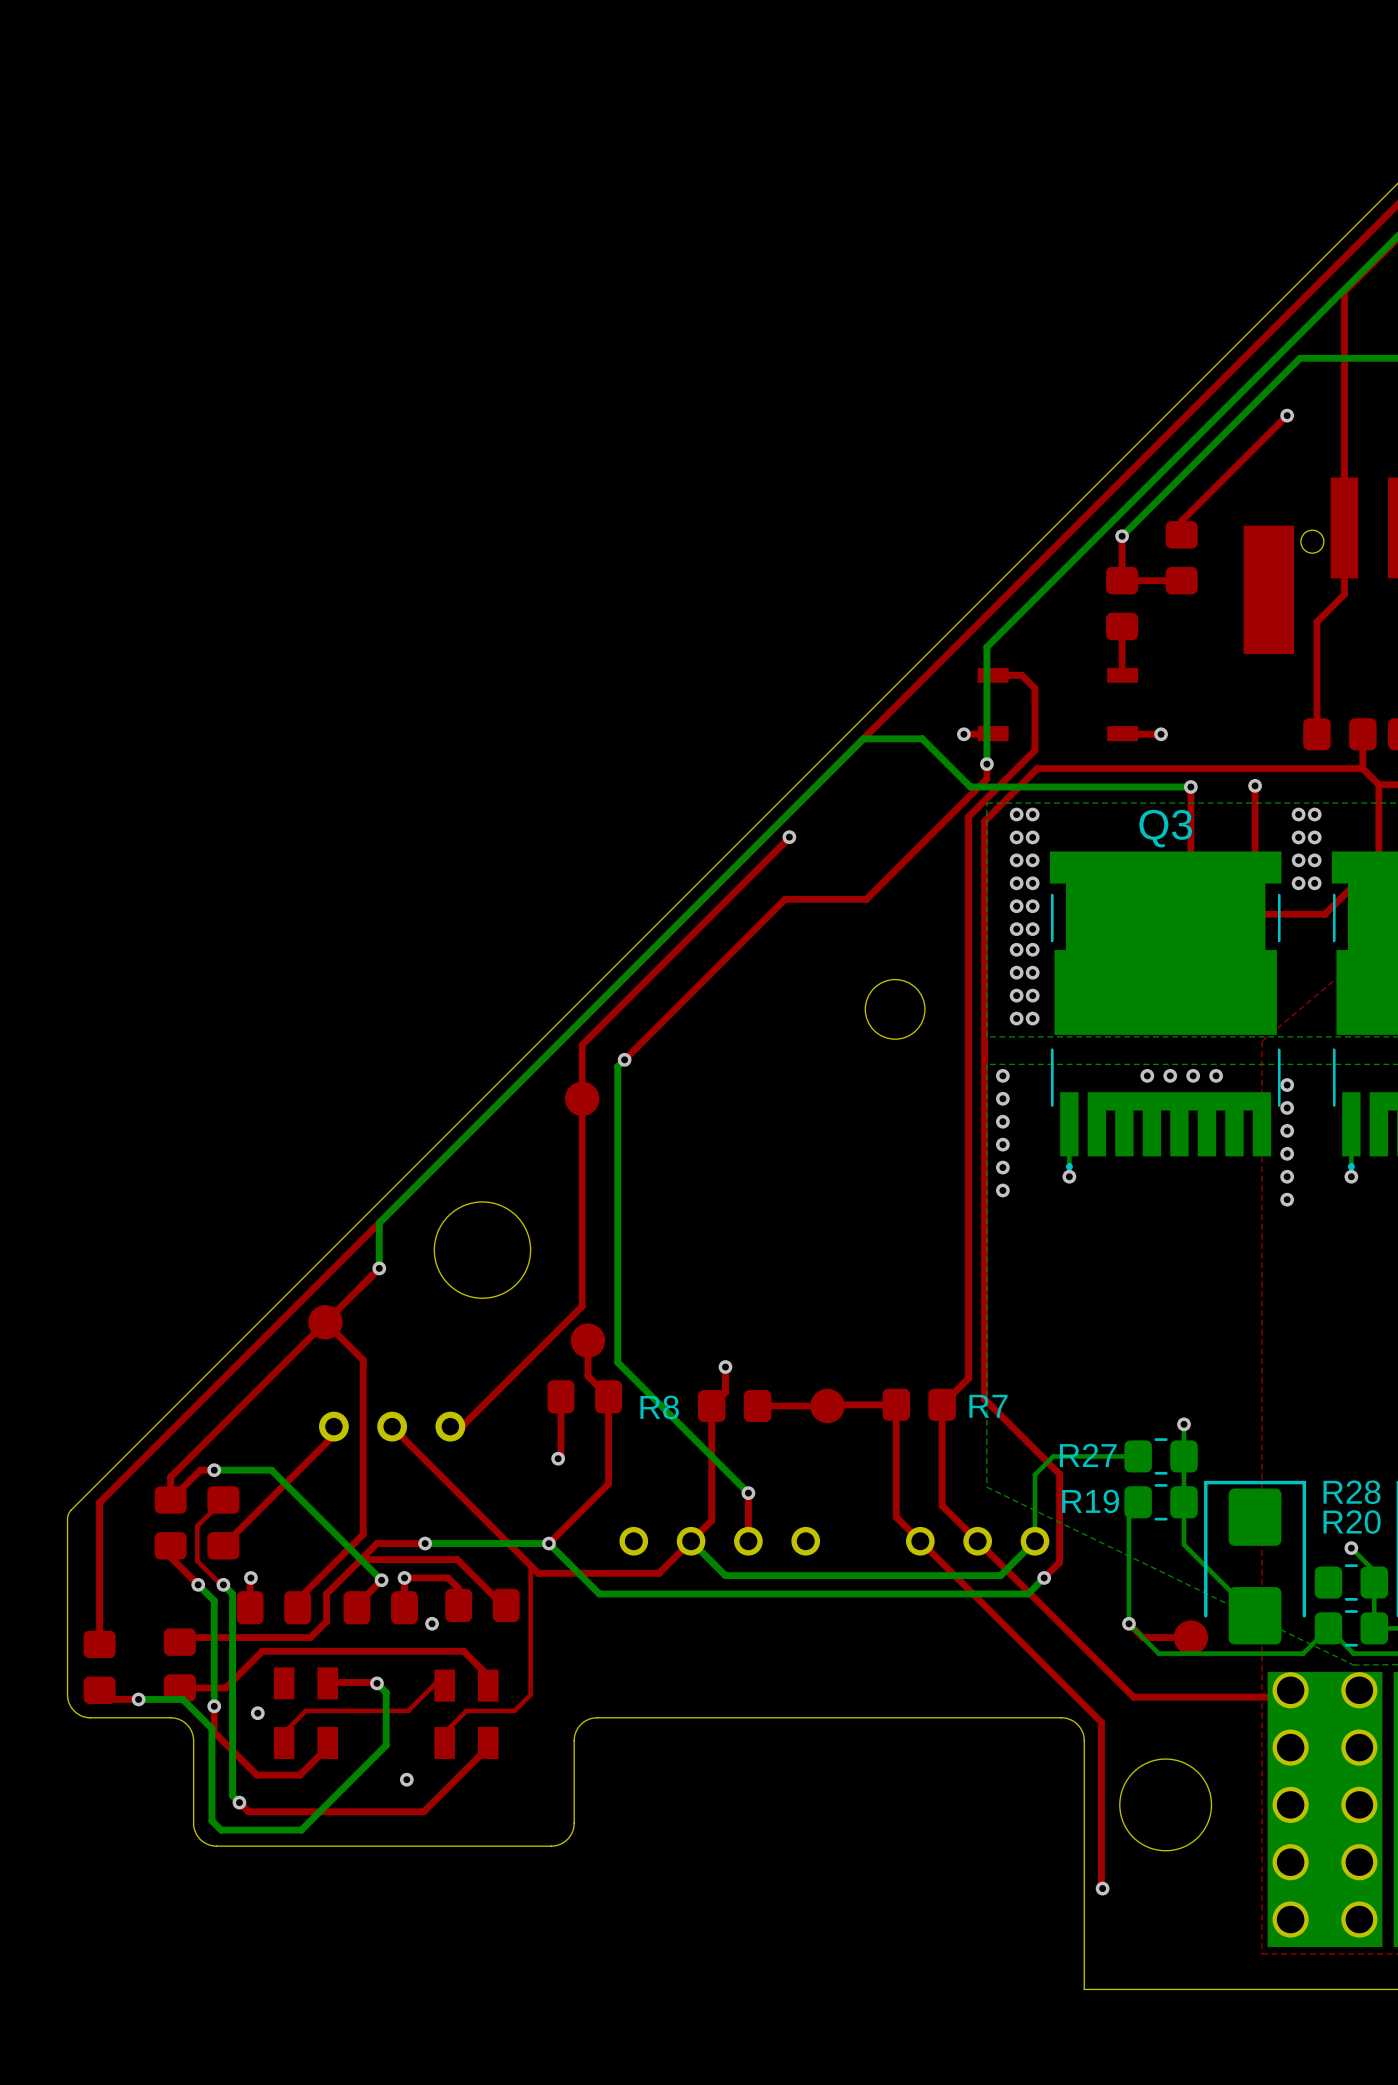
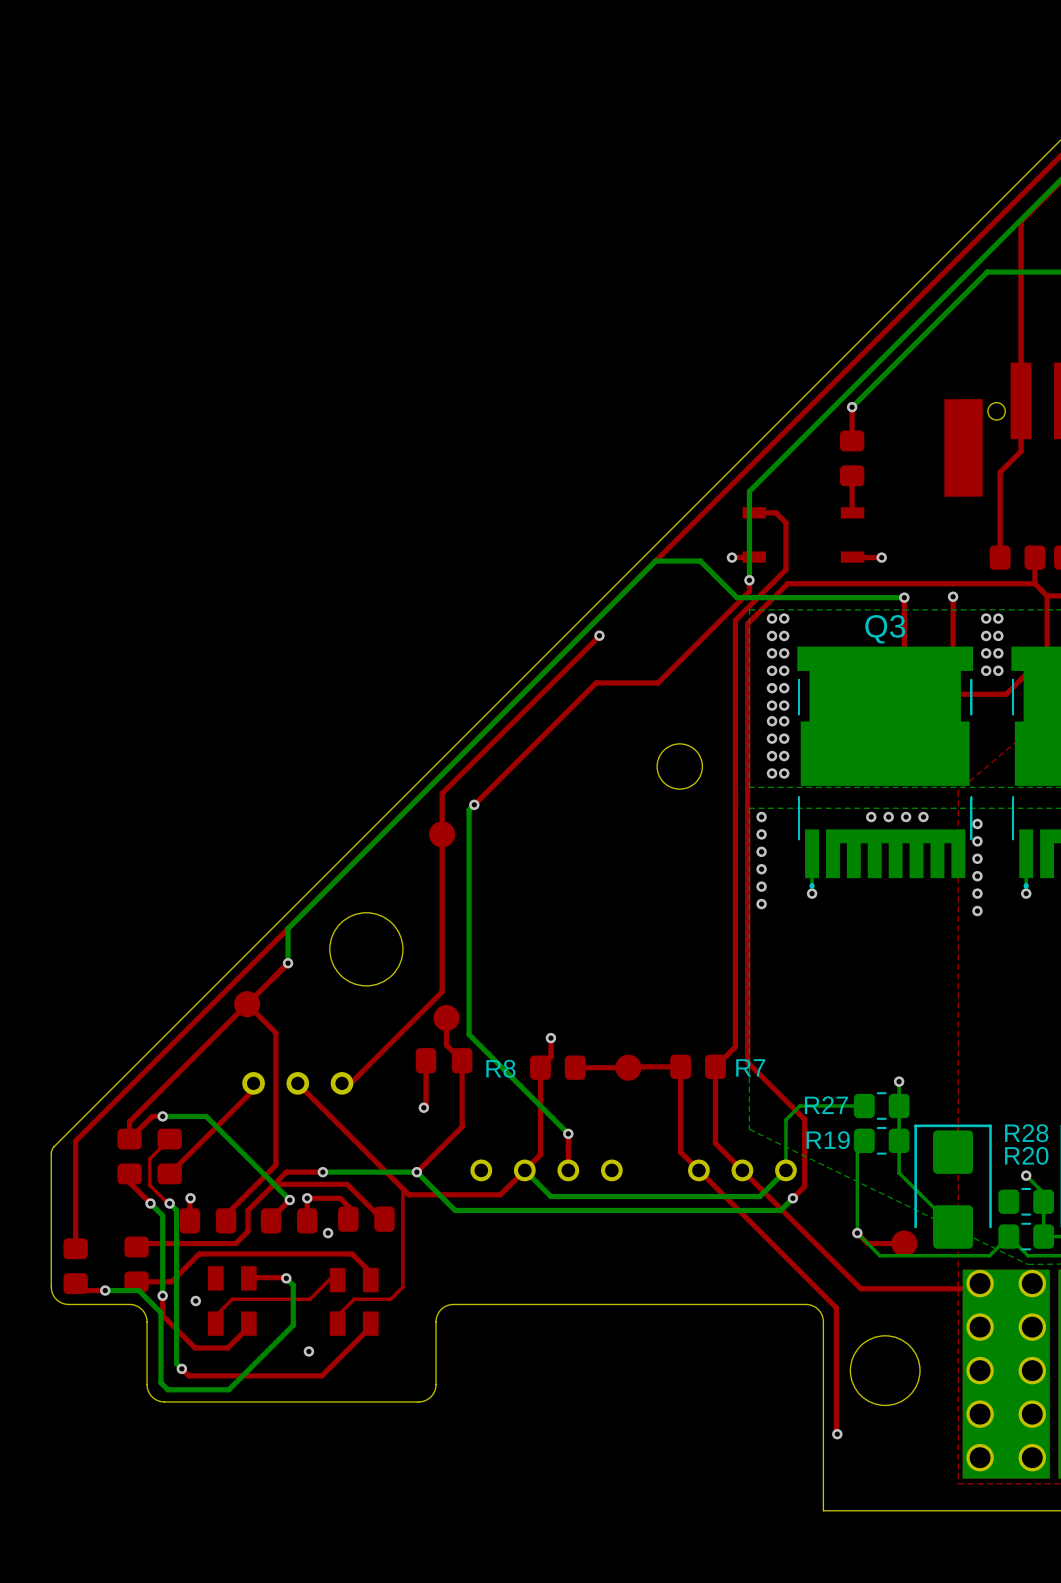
top track: (1287, 415) (1181, 521) (1181, 534) -> none
via: (1287, 415) -> none
part: (1181, 557) -> none
top track: (1181, 580) (1122, 580) -> none

